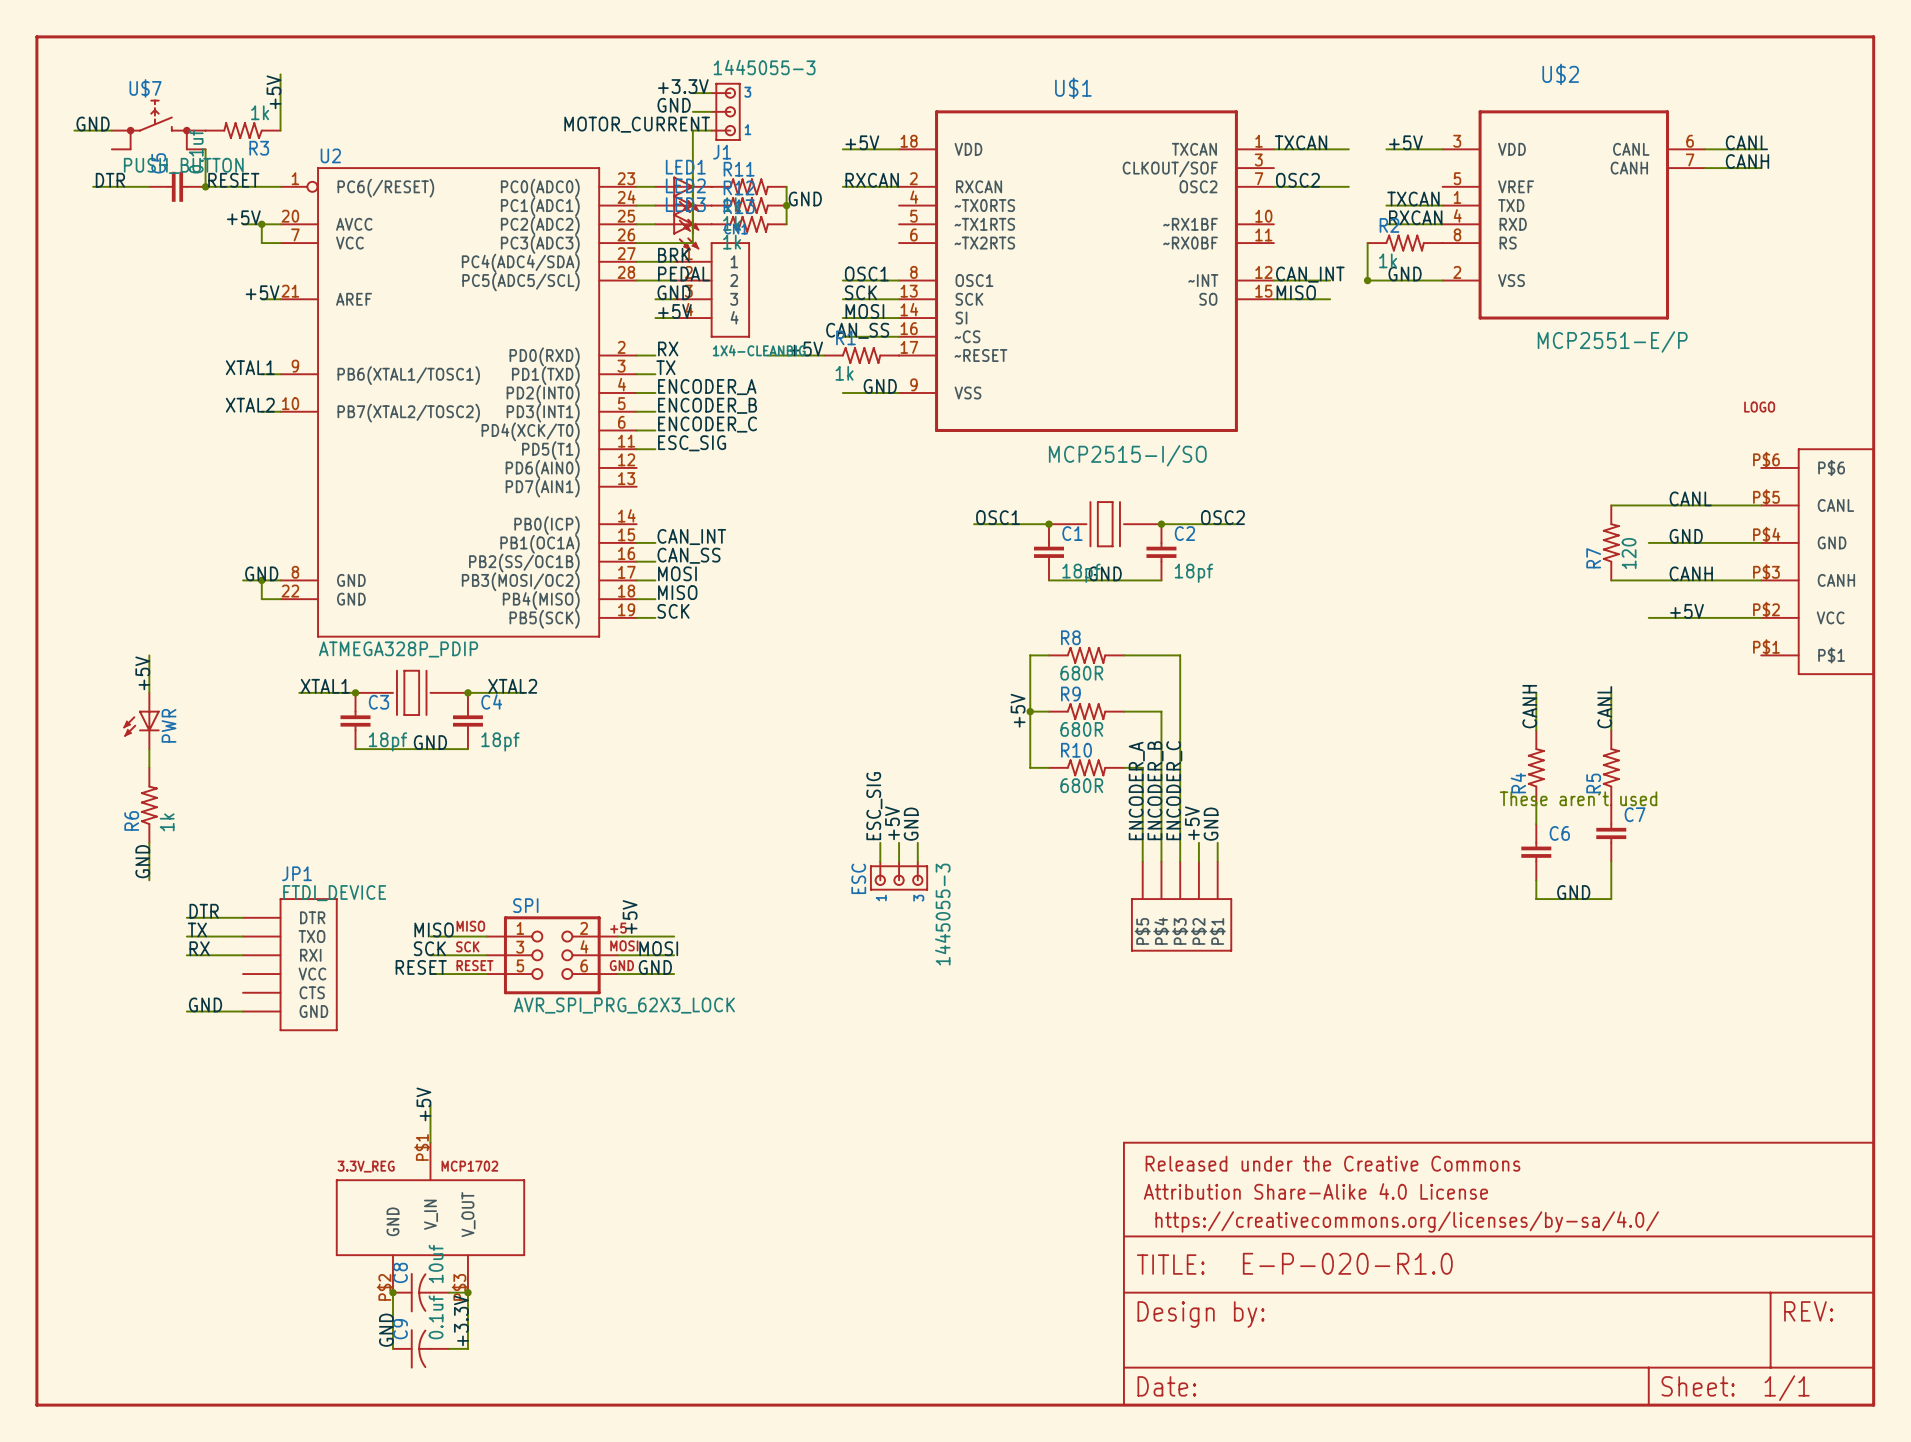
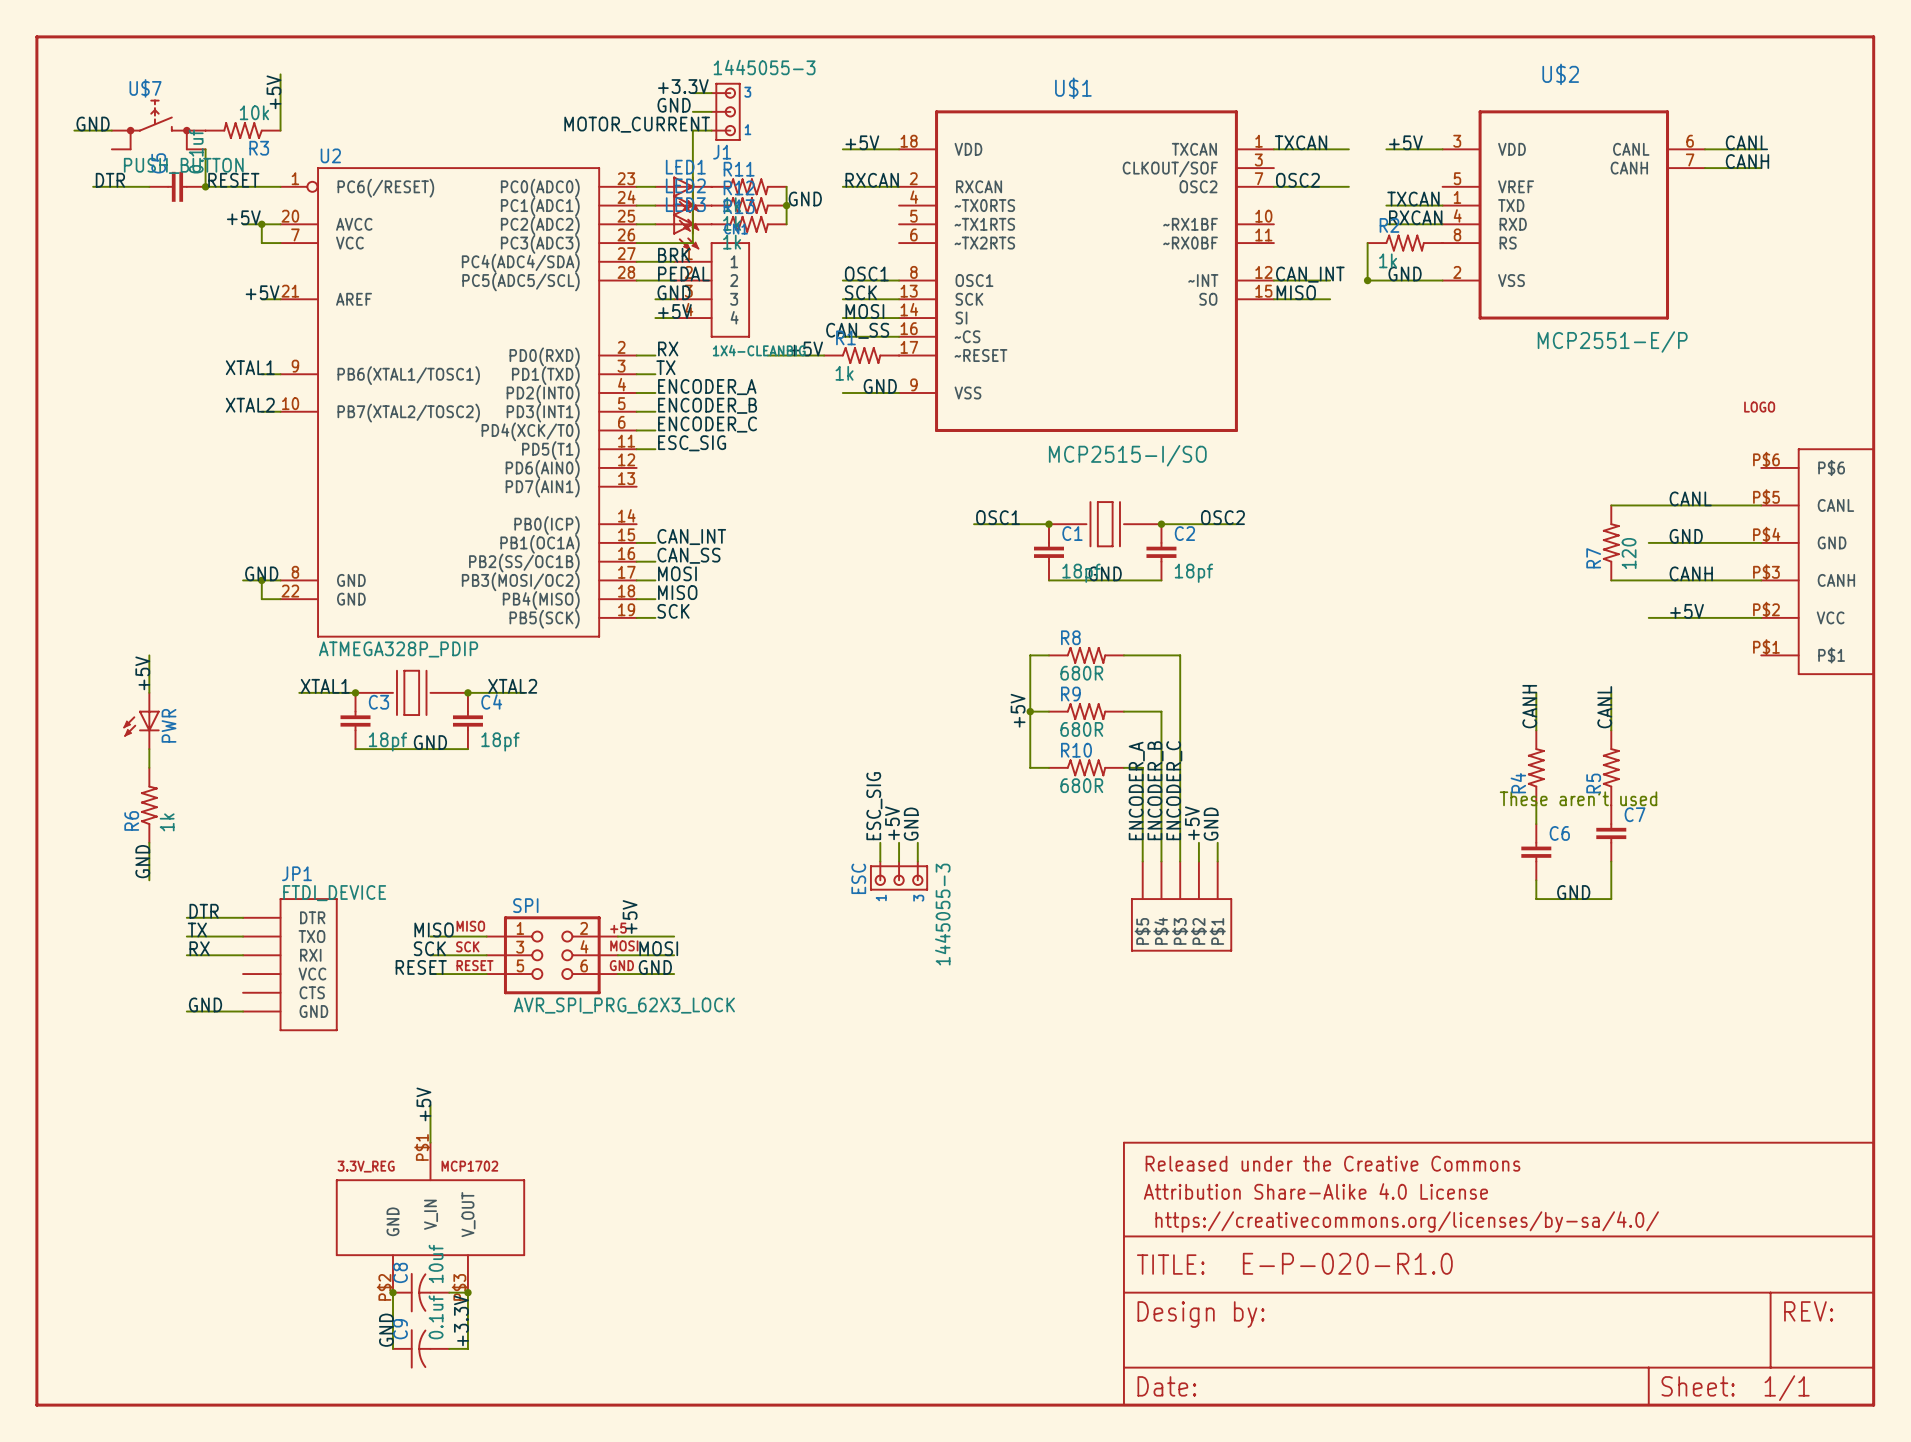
R3 value: 1k (260, 112) -> 10k (254, 112)

